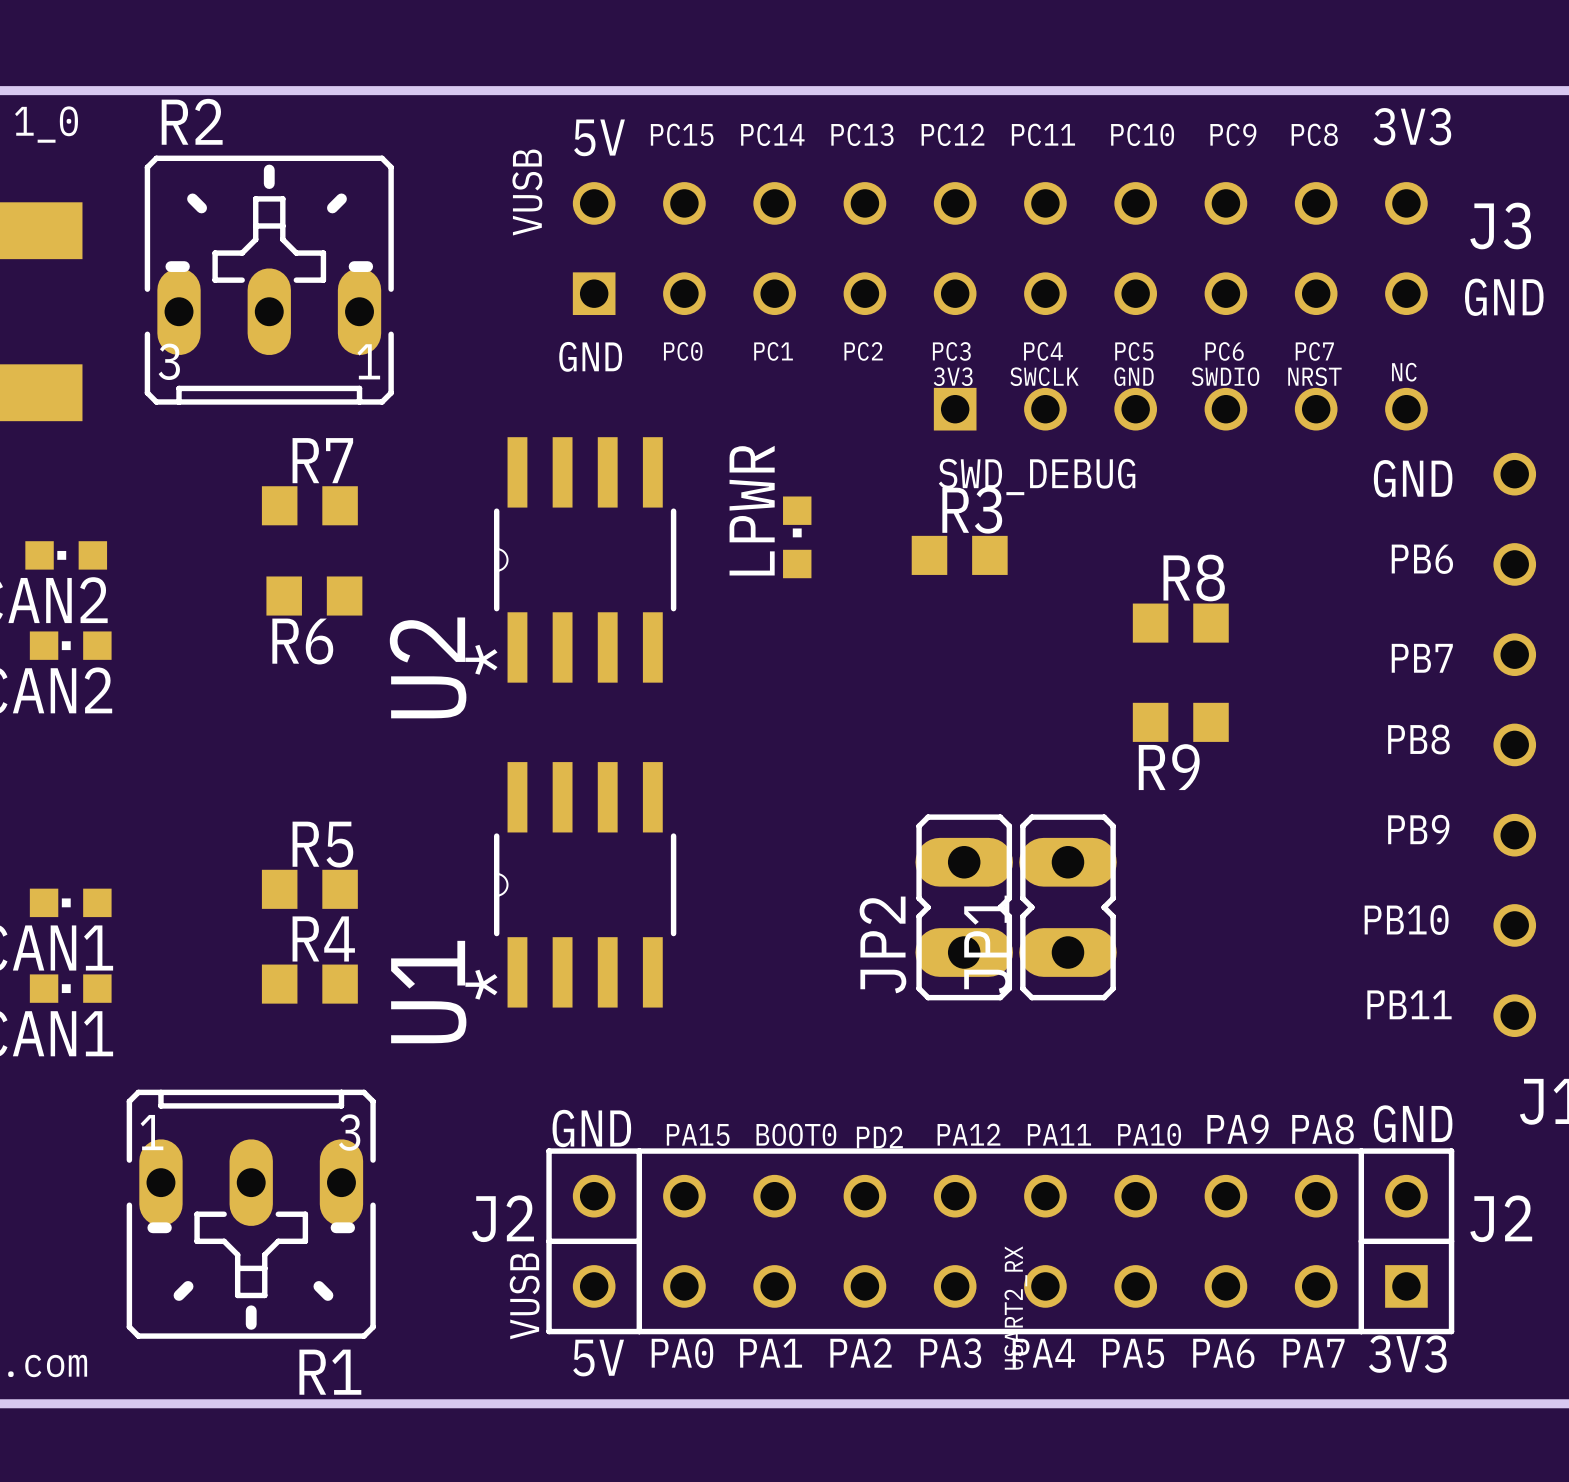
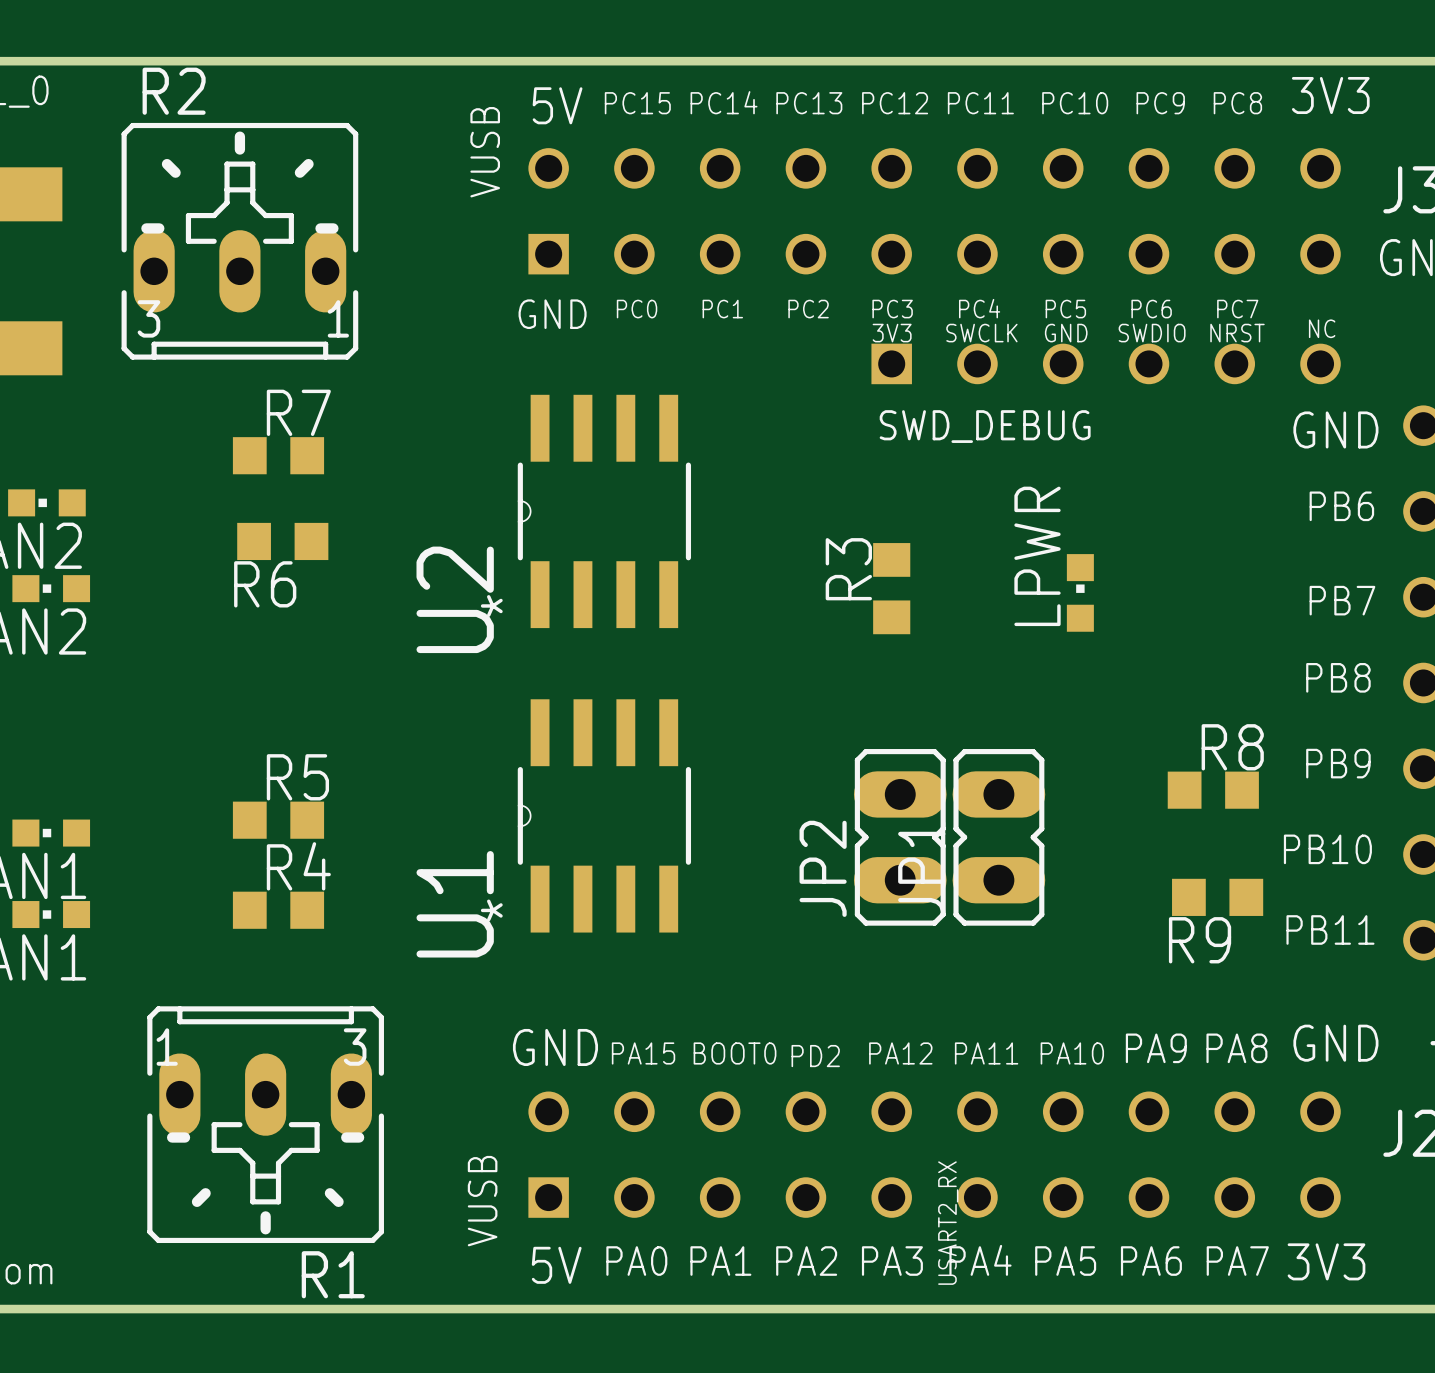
R3 name position: R3 (972, 510) -> R3 (848, 569)
LPWR position: (797, 537) -> (1080, 592)
R3 rotation: 0° (959, 555) -> 90° clockwise (891, 588)
R3 position: (959, 555) -> (891, 588)
U2 position: (585, 559) -> (604, 511)
R8 position: (1180, 623) -> (1213, 790)
R9 position: (1180, 722) -> (1217, 897)
U1 position: (585, 884) -> (604, 815)
R1 position: (251, 1214) -> (265, 1124)
J2 side: bottom (1000, 1241) -> top (934, 1154)

